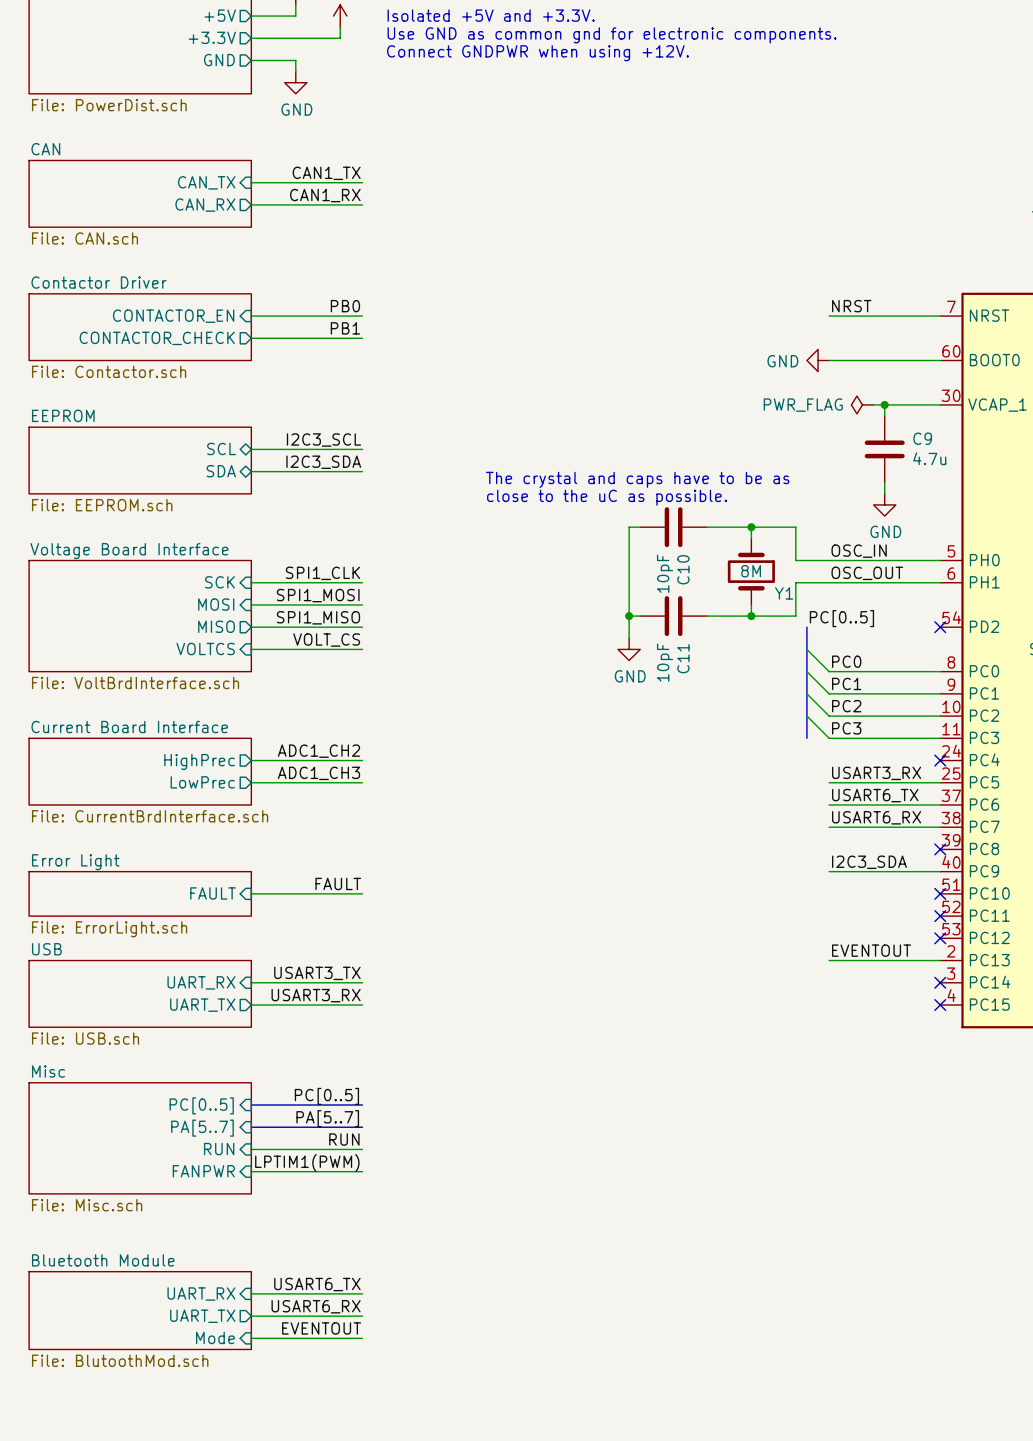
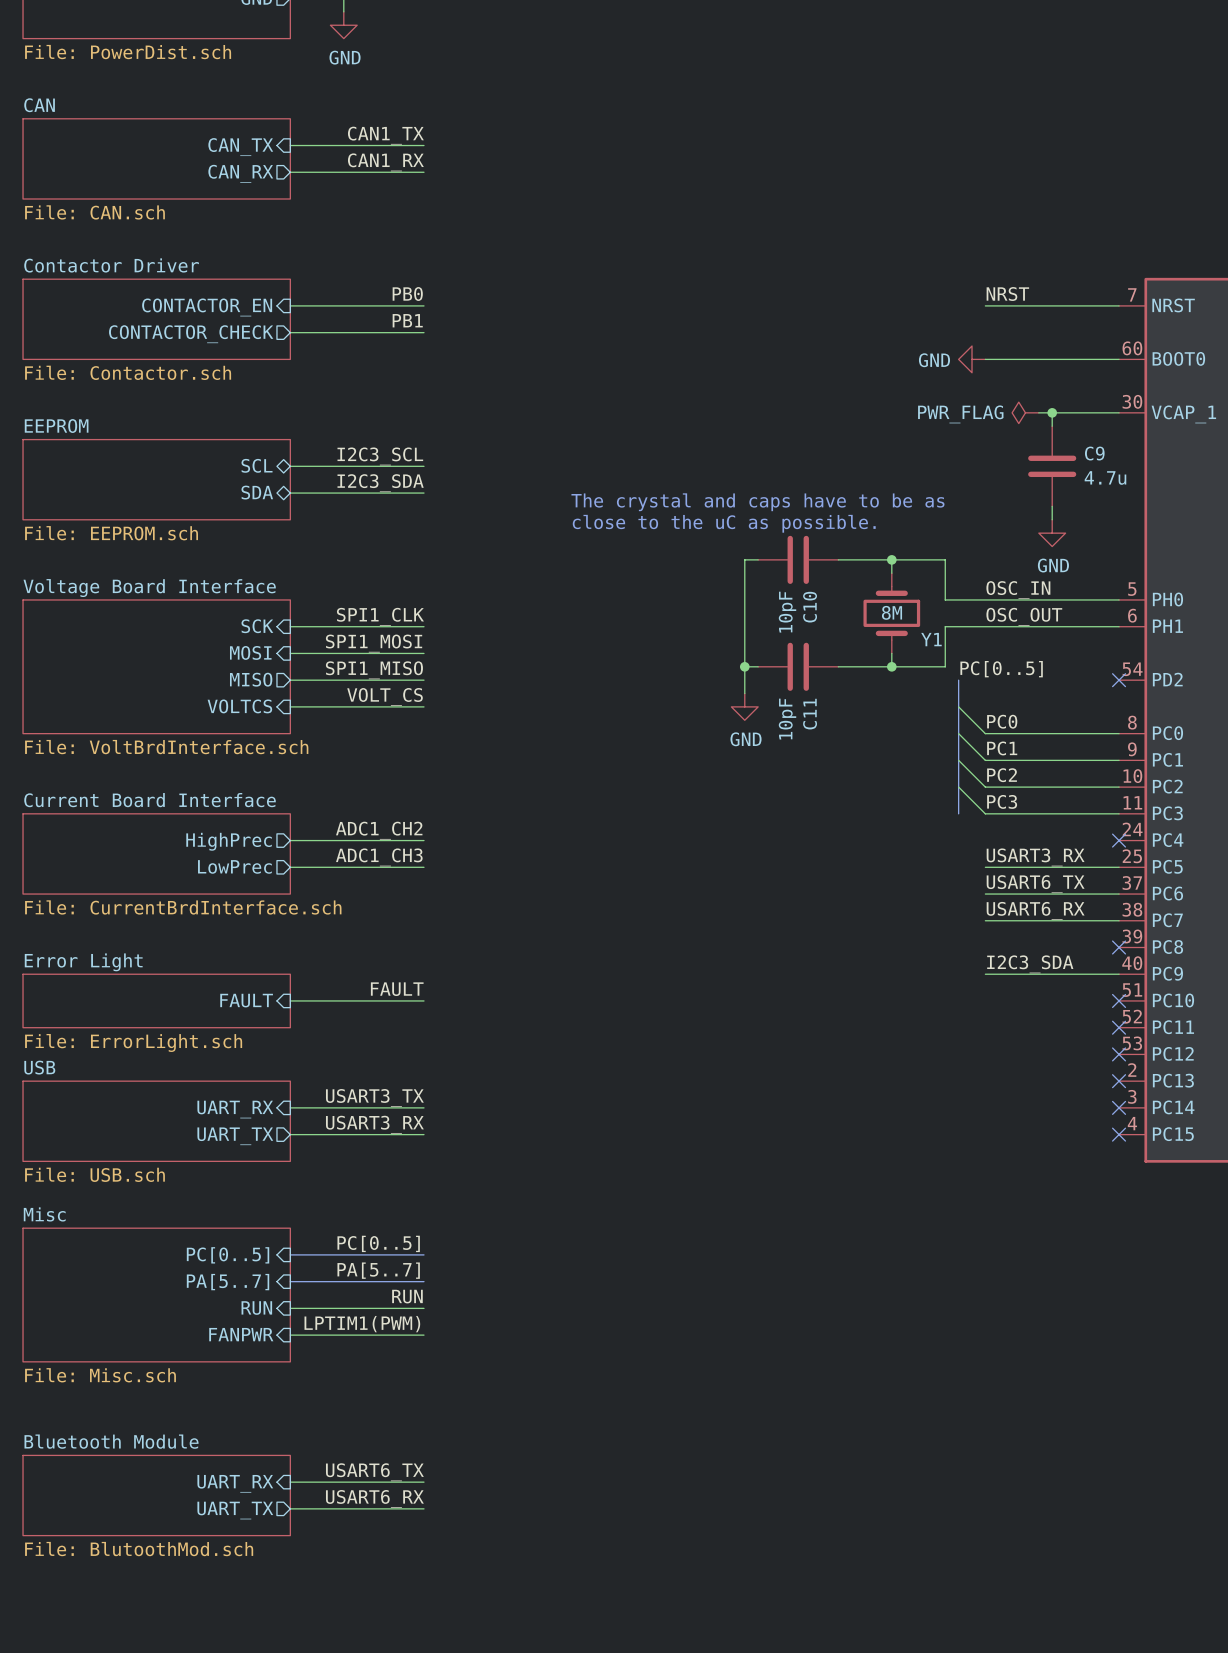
label: EVENTOUT (871, 950) -> none
wire: (829, 960) (940, 960) -> none
no-connect mark: none -> (1119, 1081)
sheet Bluetooth Module shape: [29, 1271, 252, 1350] -> [23, 1455, 291, 1536]
label: EVENTOUT (321, 1328) -> none
sheet pin: Mode (215, 1337) -> none
wire: (251, 1338) (362, 1338) -> none

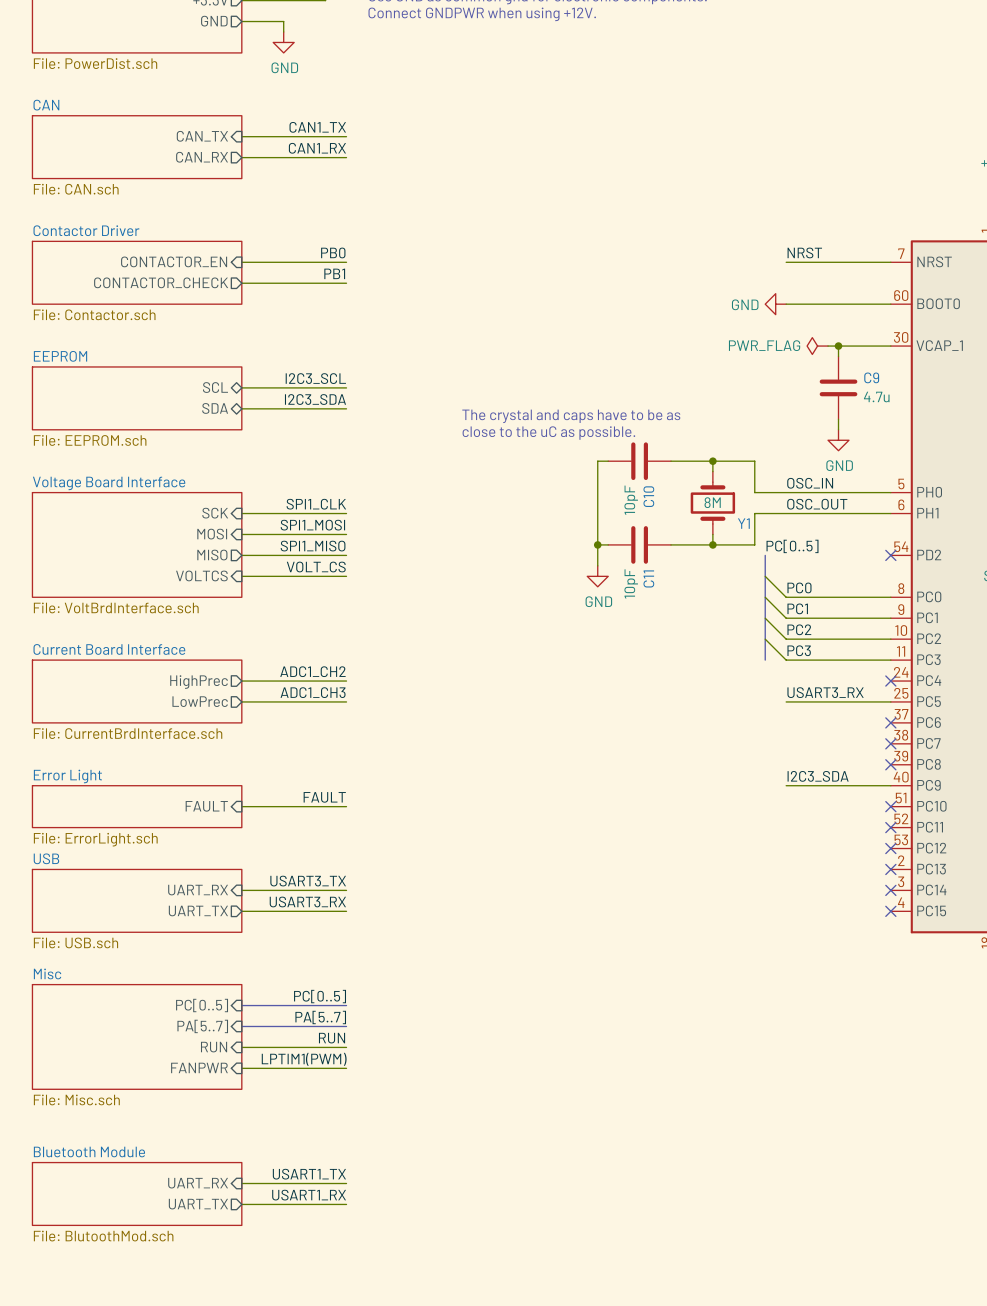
label: USART6_TX (1035, 884) -> none
wire: (985, 894) (1119, 894) -> none
no-connect mark: none -> (890, 722)
label: USART6_RX (1035, 910) -> none
wire: (985, 920) (1119, 920) -> none
no-connect mark: none -> (890, 743)
label: USART6_TX (374, 1472) -> USART1_TX (309, 1174)
label: USART6_RX (374, 1498) -> USART1_RX (309, 1195)

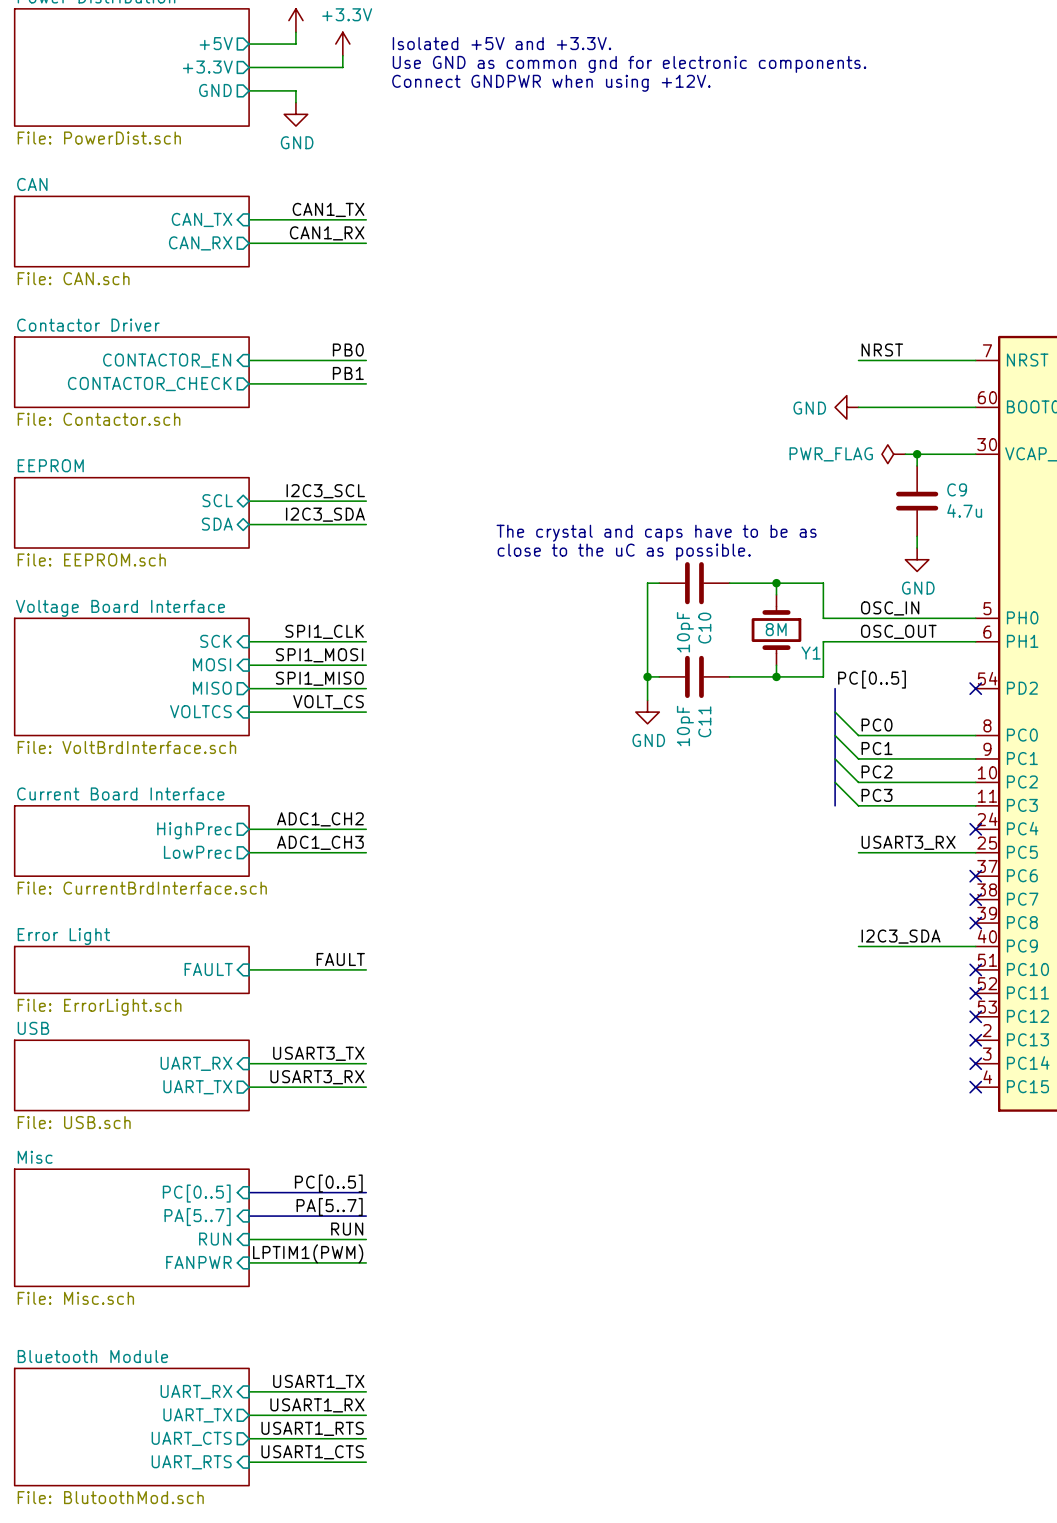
sheet Bluetooth Module: File: BlutoothMod.sch (137, 1193) -> none
sheet Bluetooth Module: none -> File: BlutoothMod.sch (131, 1427)
label: none -> USART1_RTS (312, 1428)
sheet pin: none -> UART_CTS (191, 1438)
wire: none -> (249, 1438) (366, 1438)
label: none -> USART1_CTS (312, 1452)
sheet pin: none -> UART_RTS (191, 1462)
wire: none -> (249, 1462) (366, 1462)

